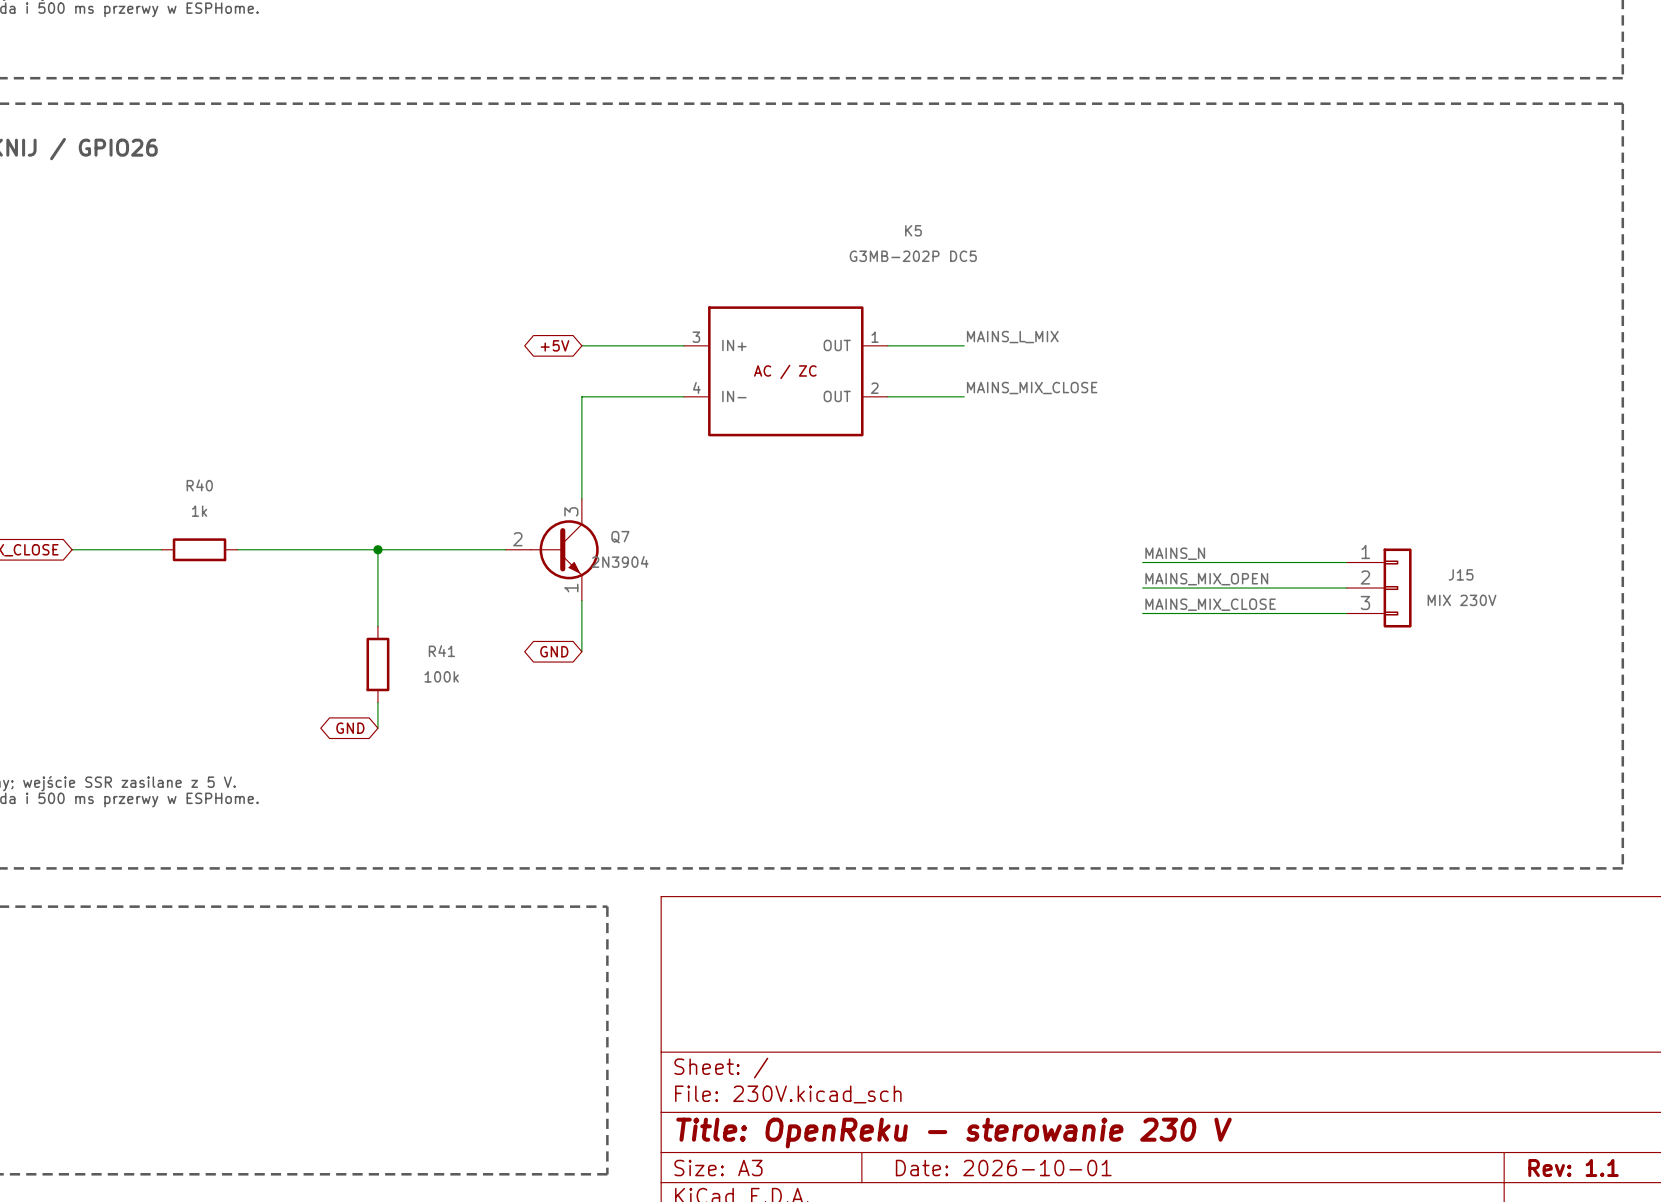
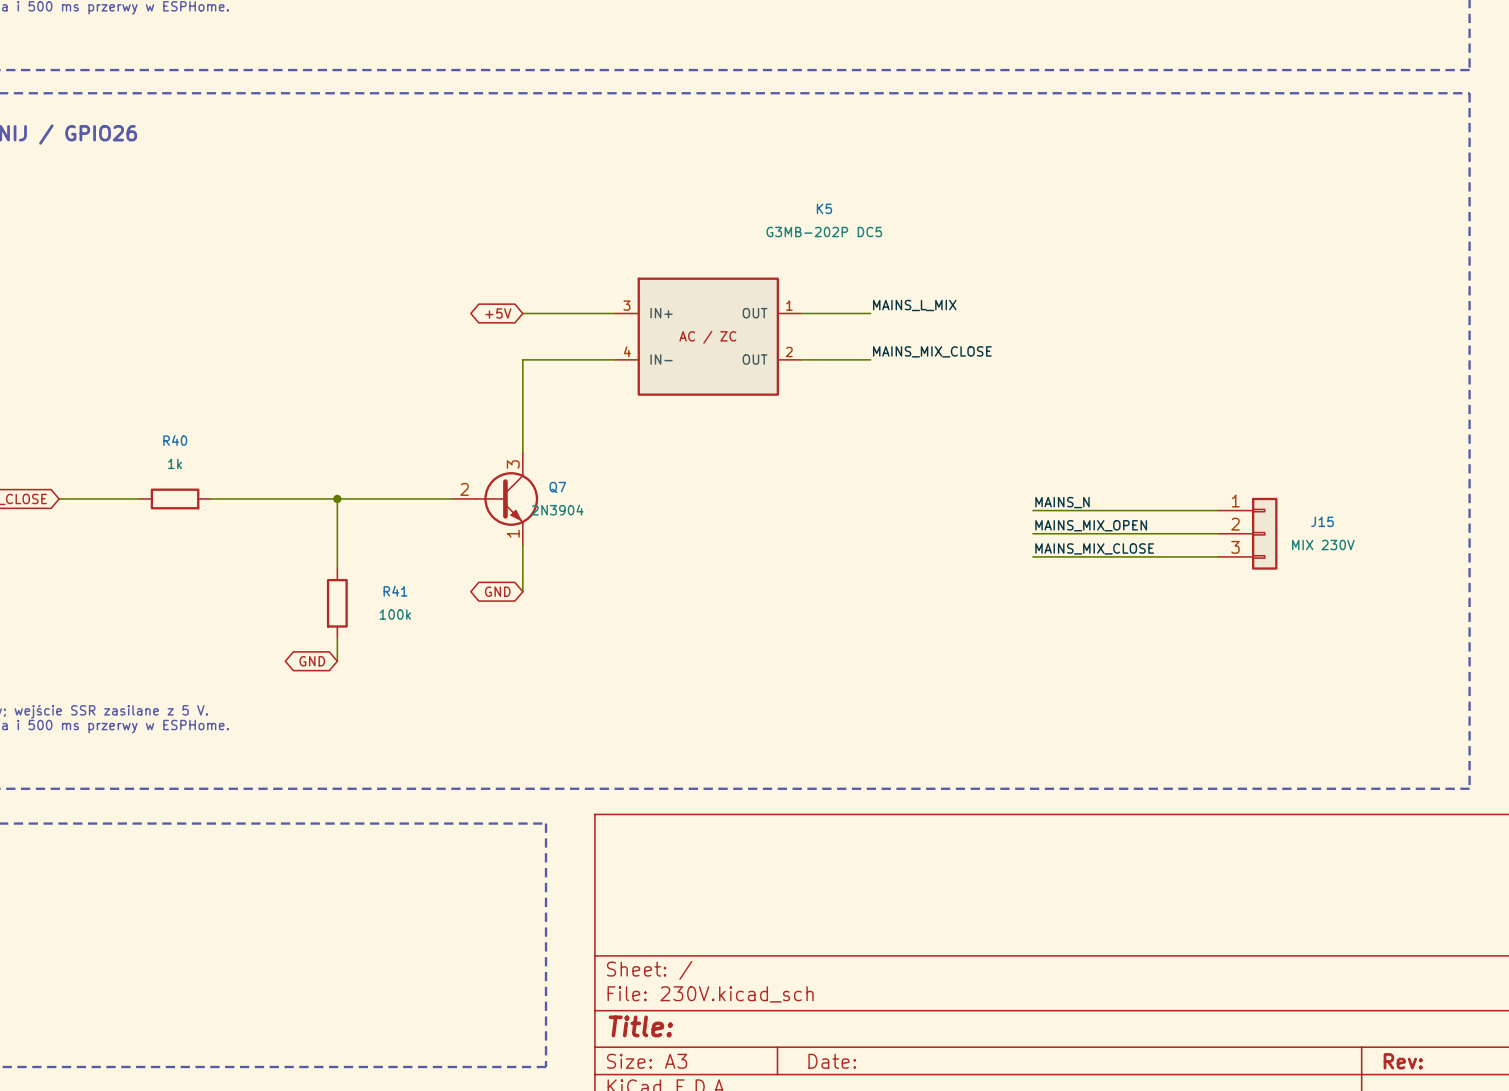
title block: Title: OpenReku - sterowanie 230 V (954, 1133) -> Title: (640, 1026)
title block: Date: 2026-10-01 (1003, 1168) -> Date: (832, 1061)
title block: Rev: 1.1 (1573, 1168) -> Rev: (1403, 1061)

